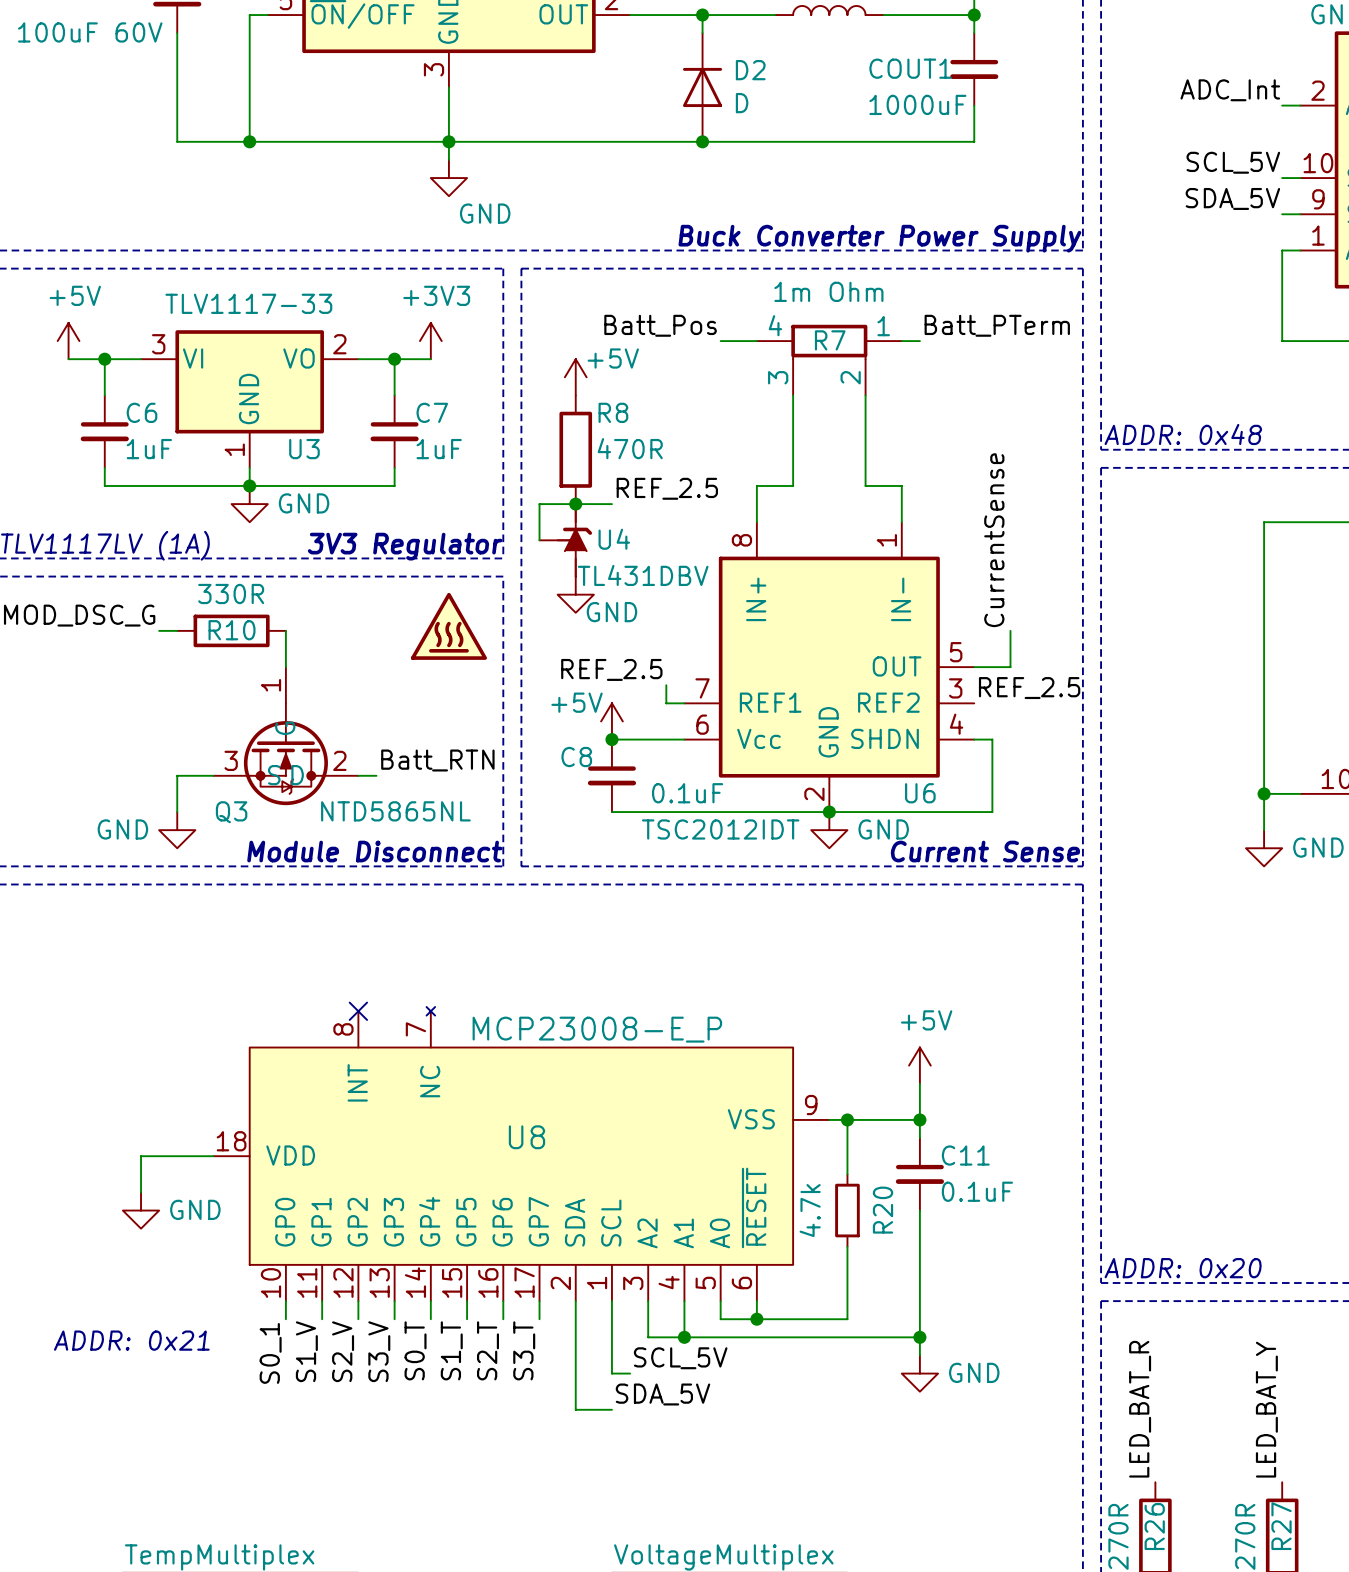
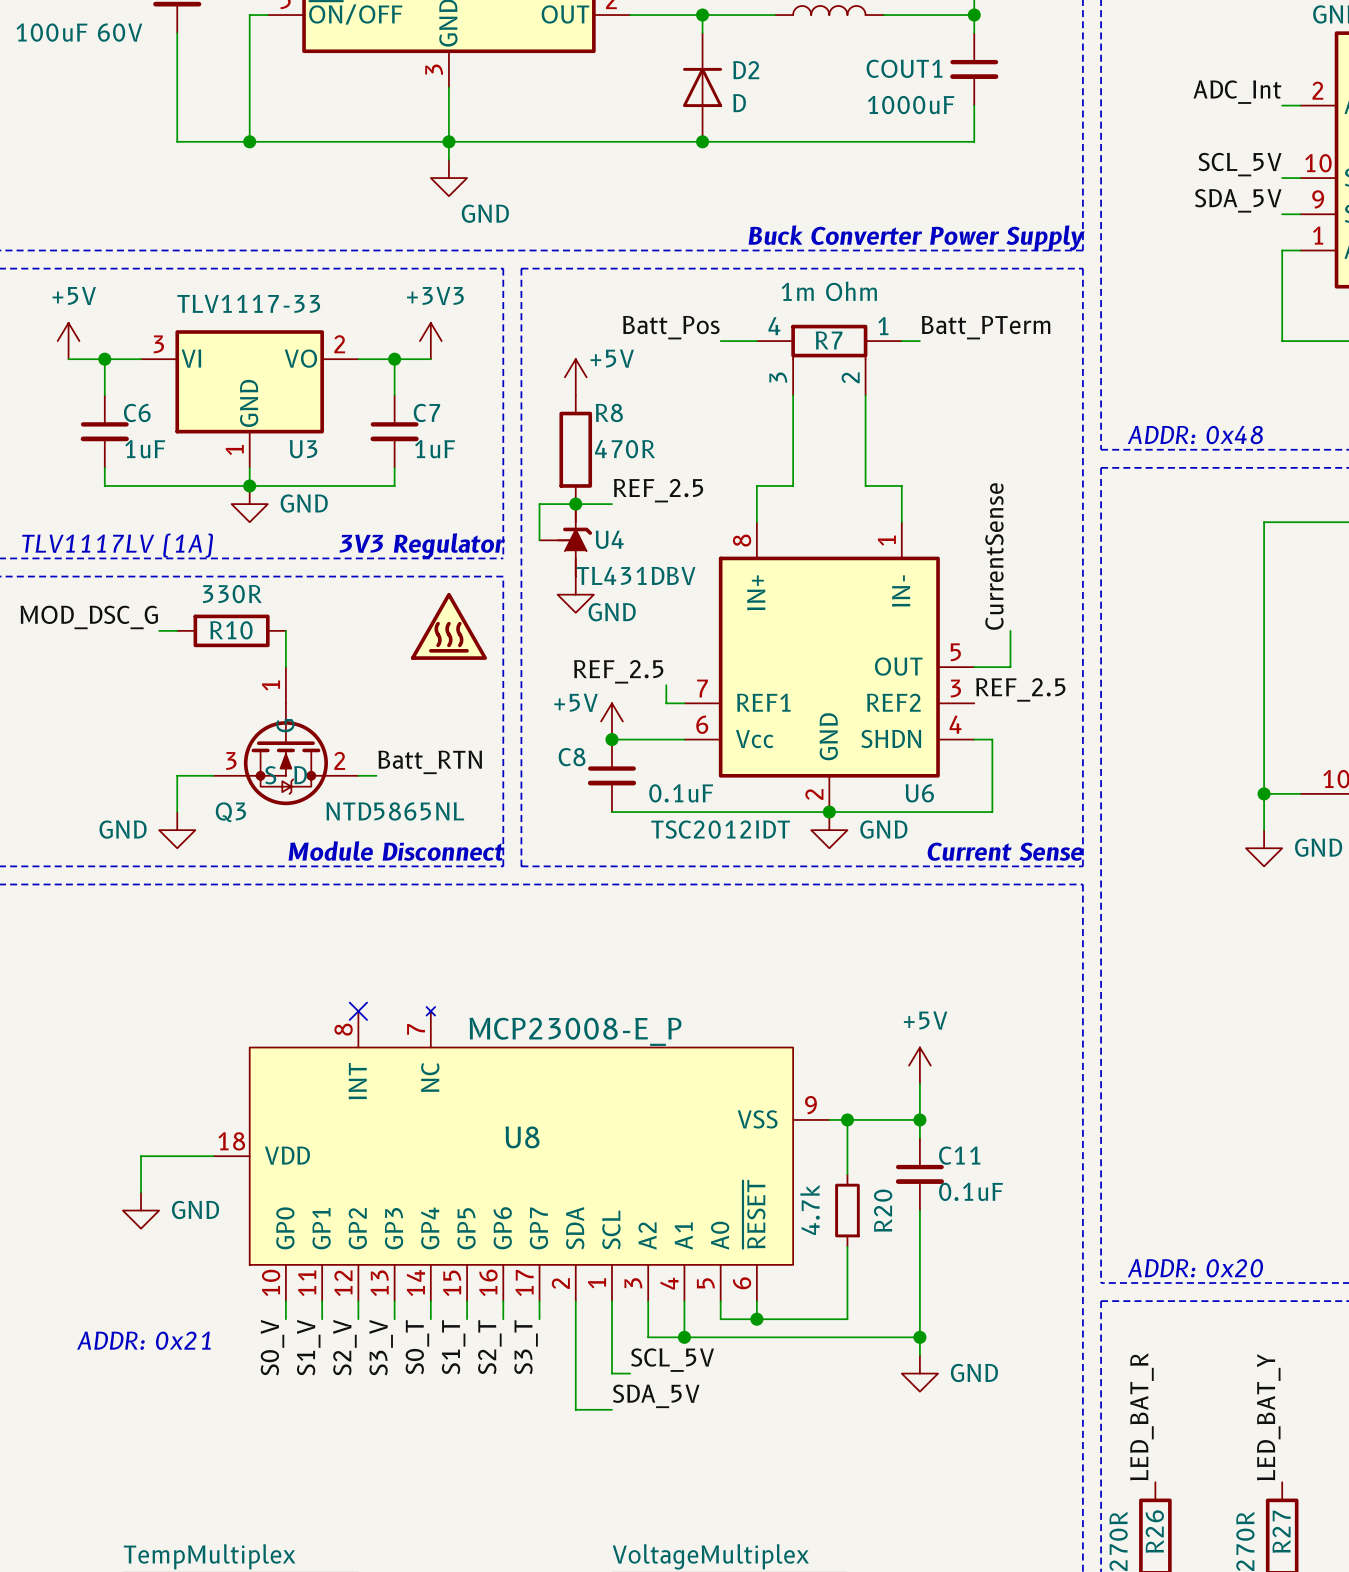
label: S0_1 (270, 1353) -> S0_V (272, 1347)

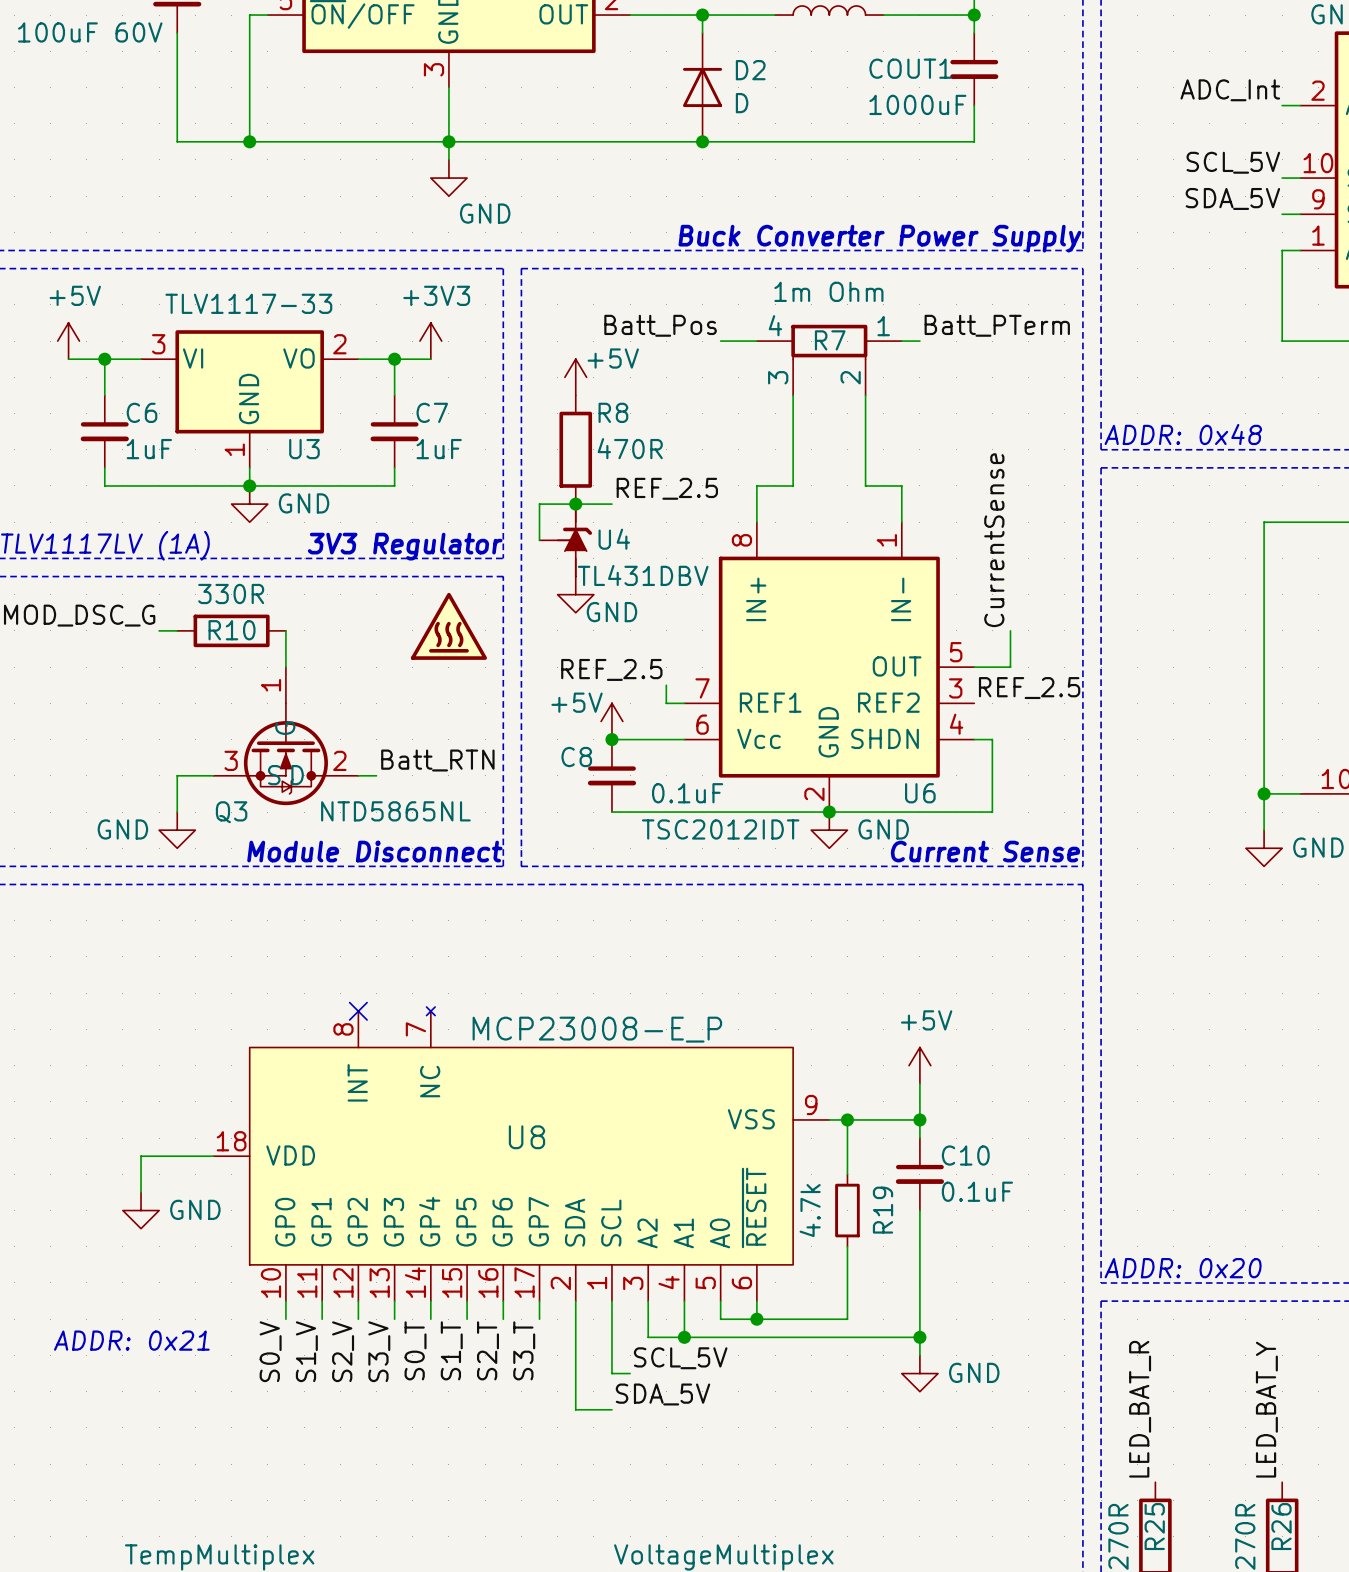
C11 name: C11 (959, 1155) -> C10 (965, 1155)
R20 name: R20 (883, 1210) -> R19 (883, 1210)
R26 name: R26 (1154, 1531) -> R25 (1154, 1526)
R27 name: R27 (1281, 1531) -> R26 (1281, 1526)

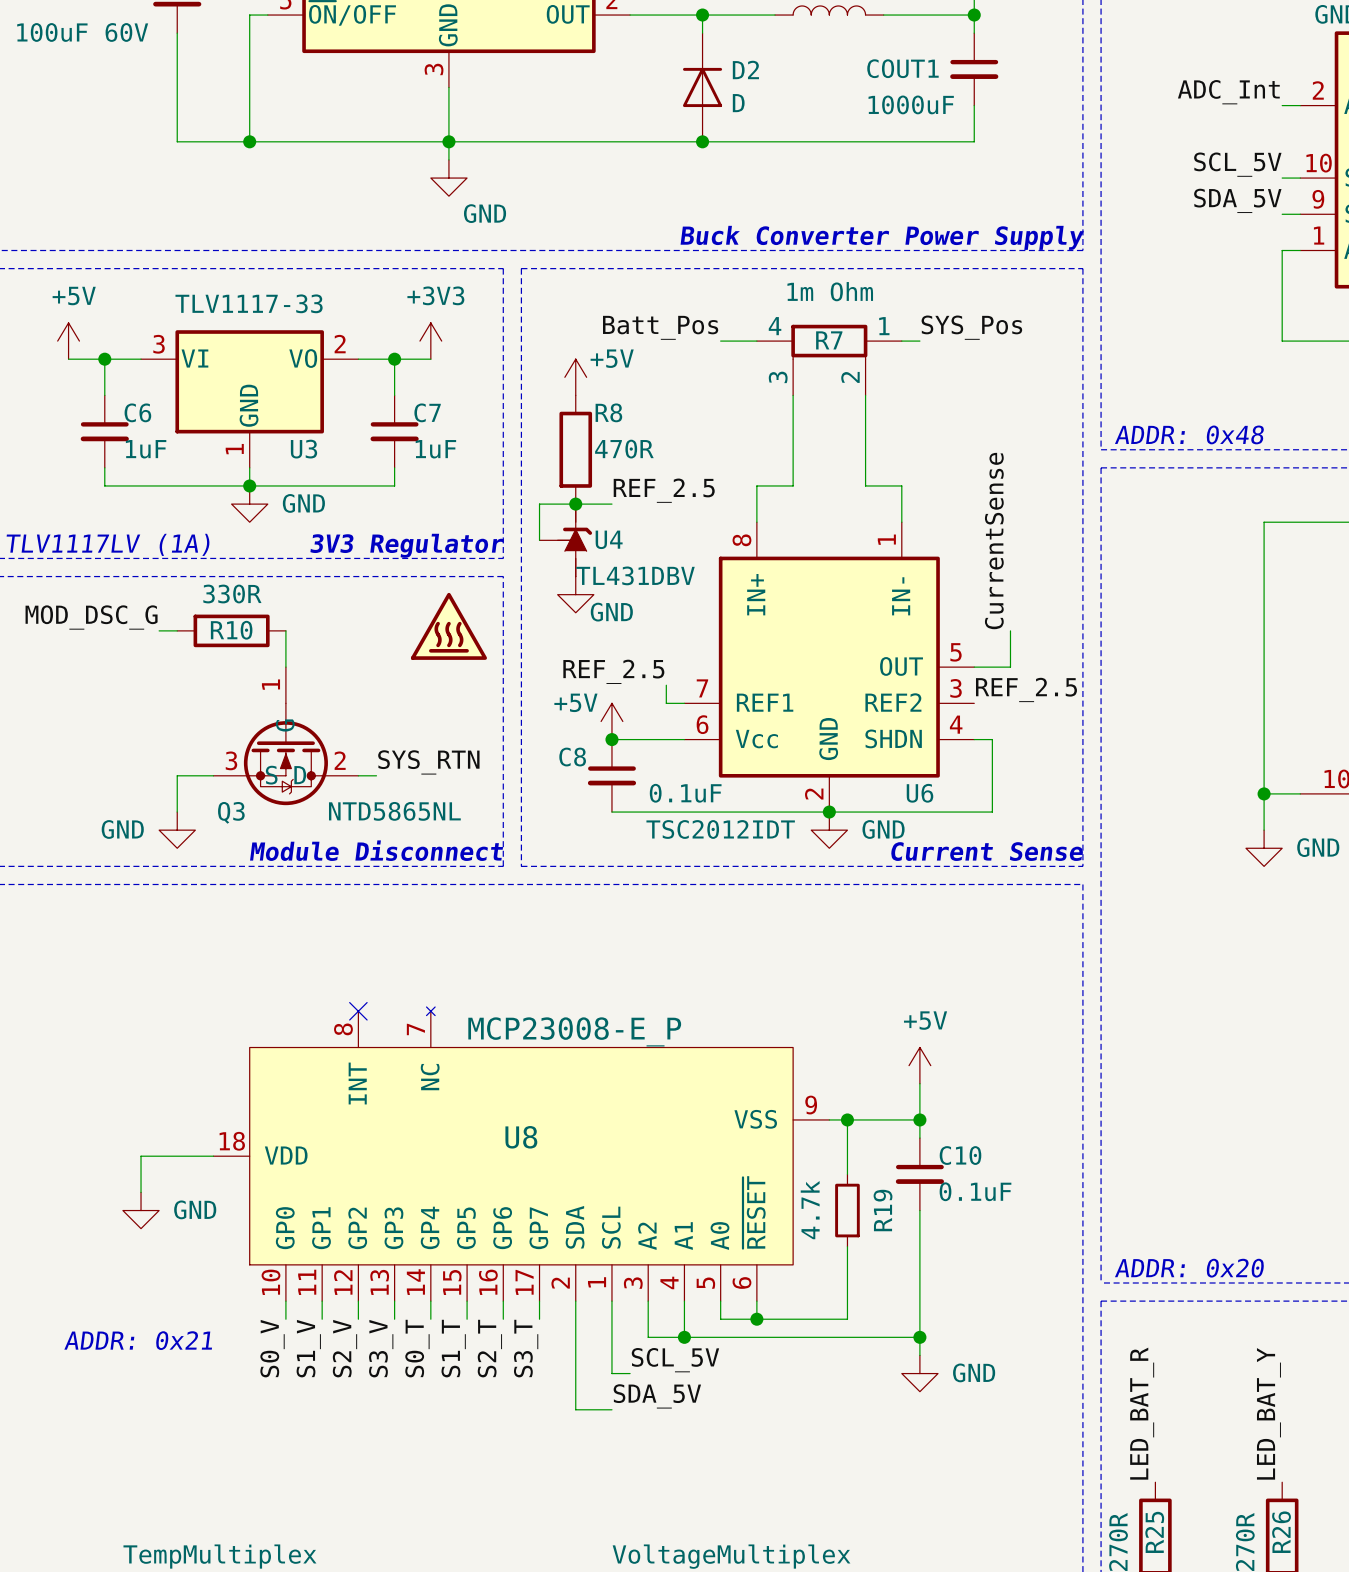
label: Batt_PTerm (997, 325) -> SYS_Pos (971, 327)
label: Batt_RTN (437, 760) -> SYS_RTN (428, 762)

